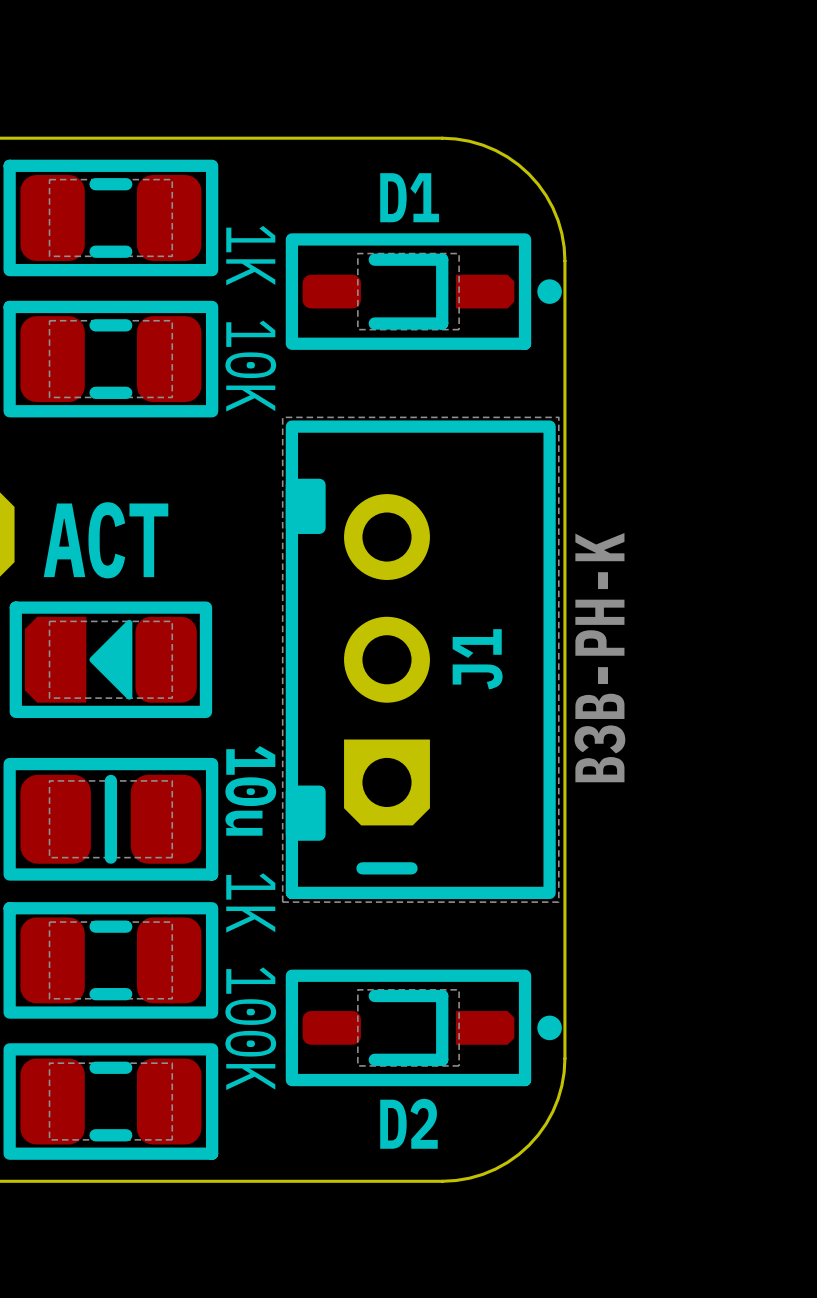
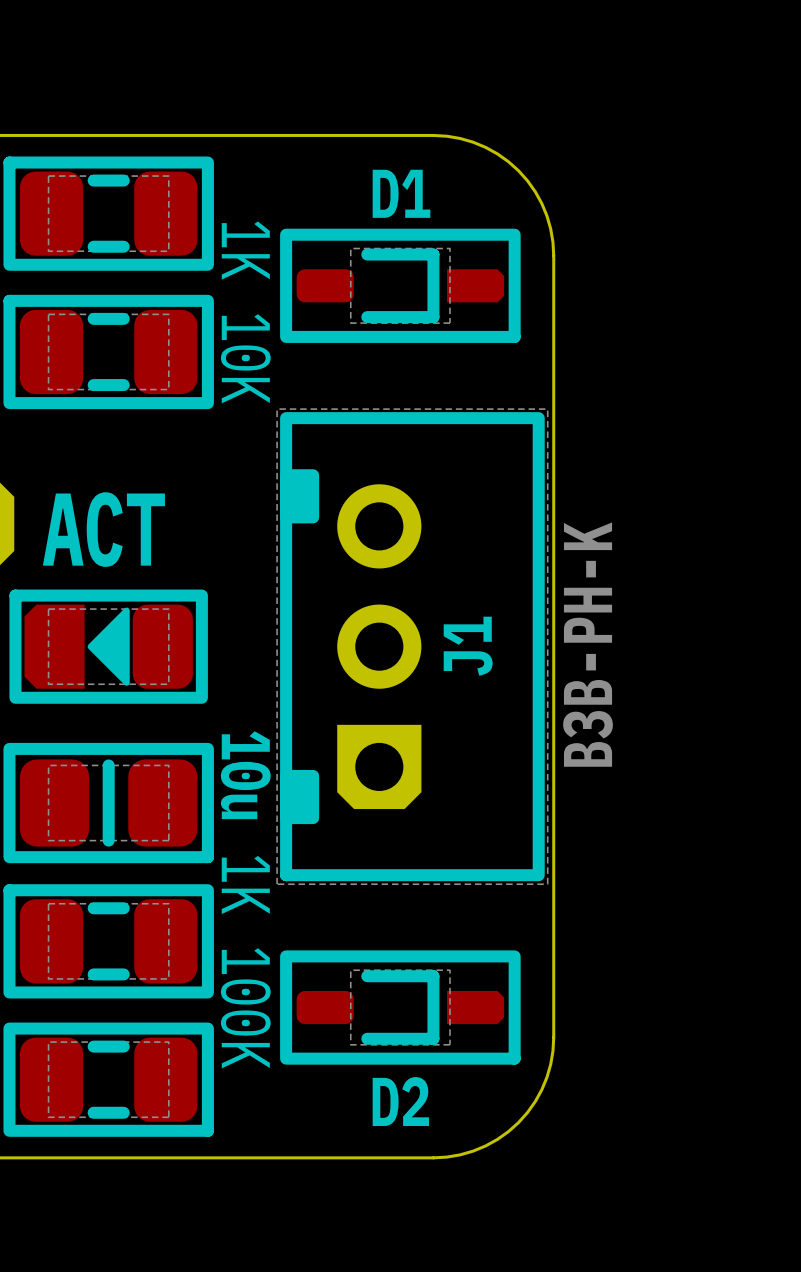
D1 footprint: [285, 233, 562, 350] -> [280, 228, 521, 343]
J1 footprint: [282, 417, 560, 903] -> [276, 408, 549, 885]
D2 footprint: [285, 969, 562, 1087] -> [280, 950, 521, 1065]

